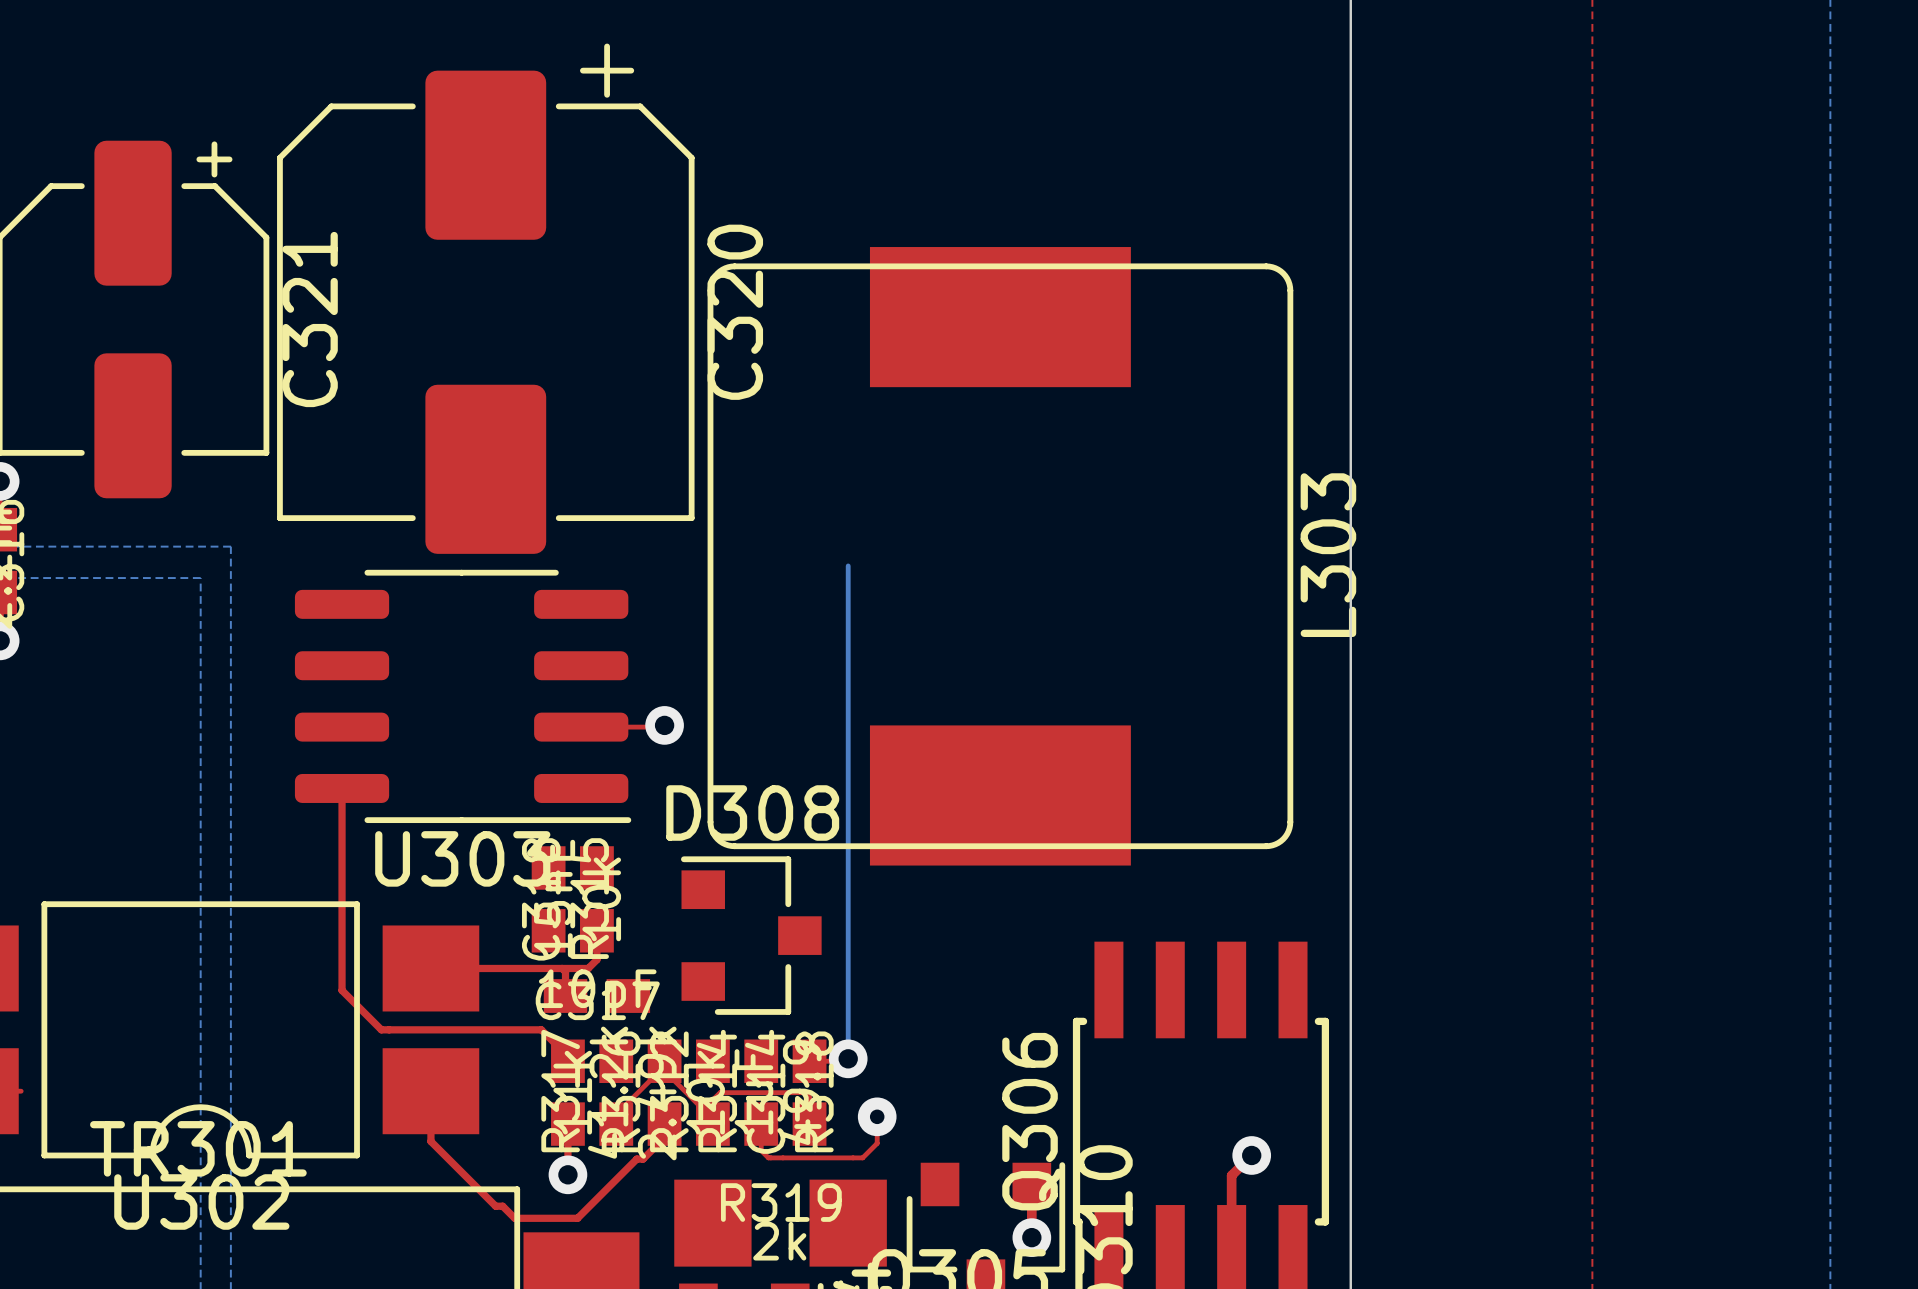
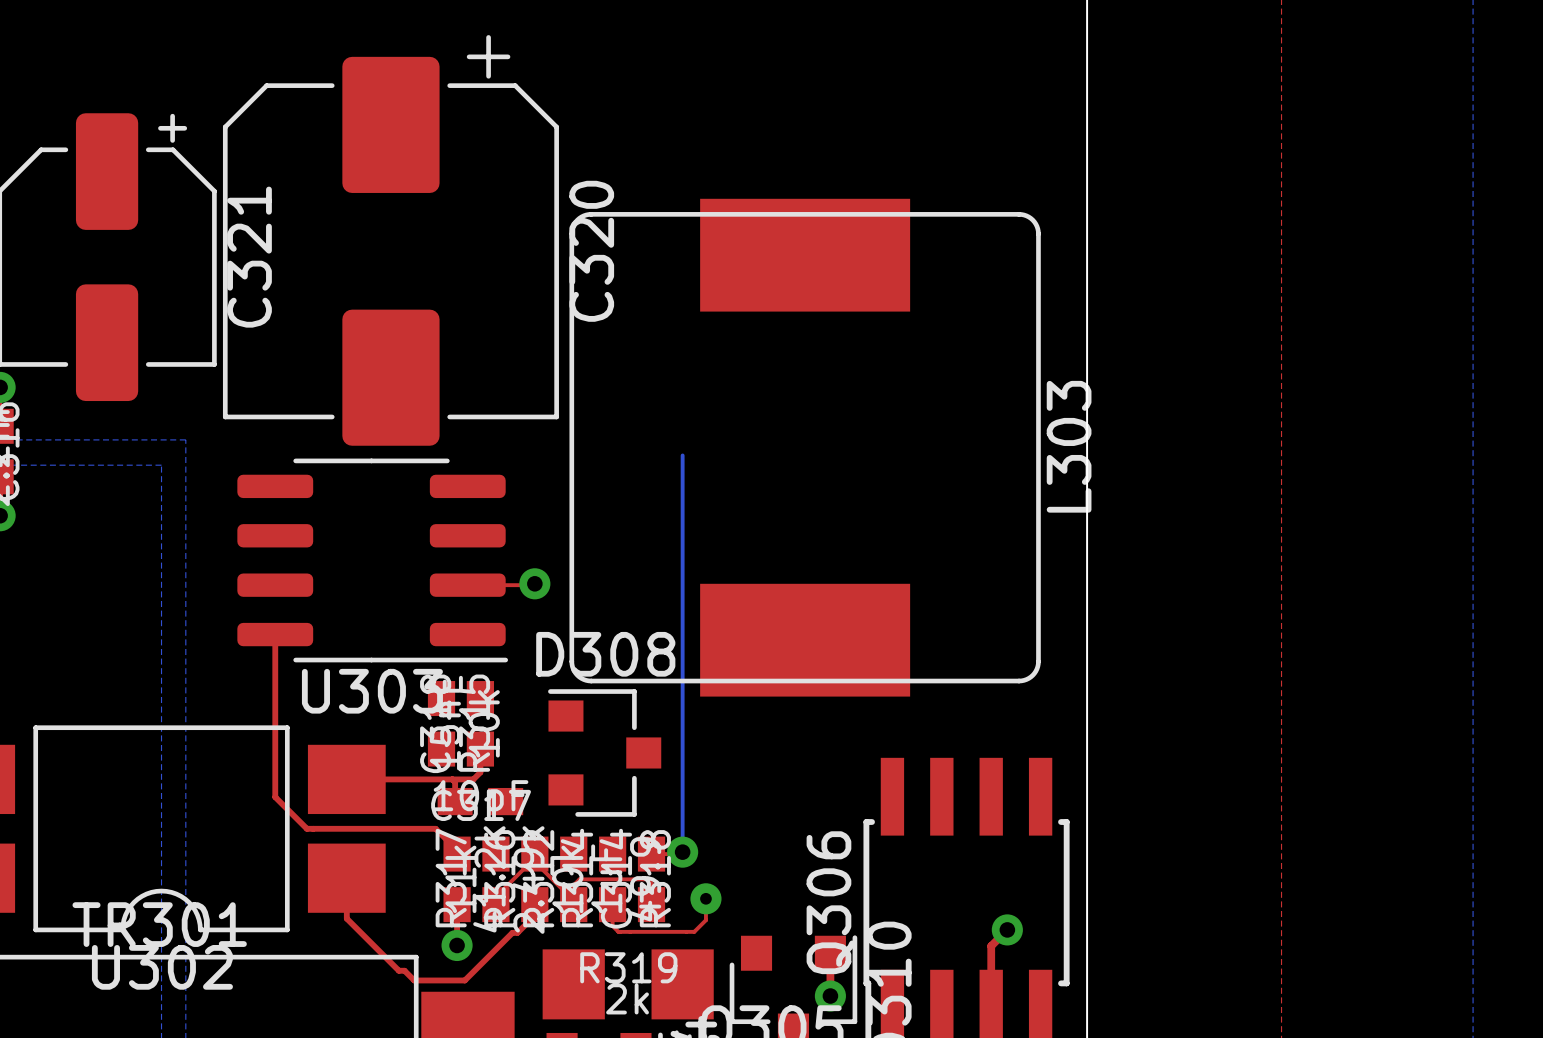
top track: (15, 1091) (21, 1091) -> none

